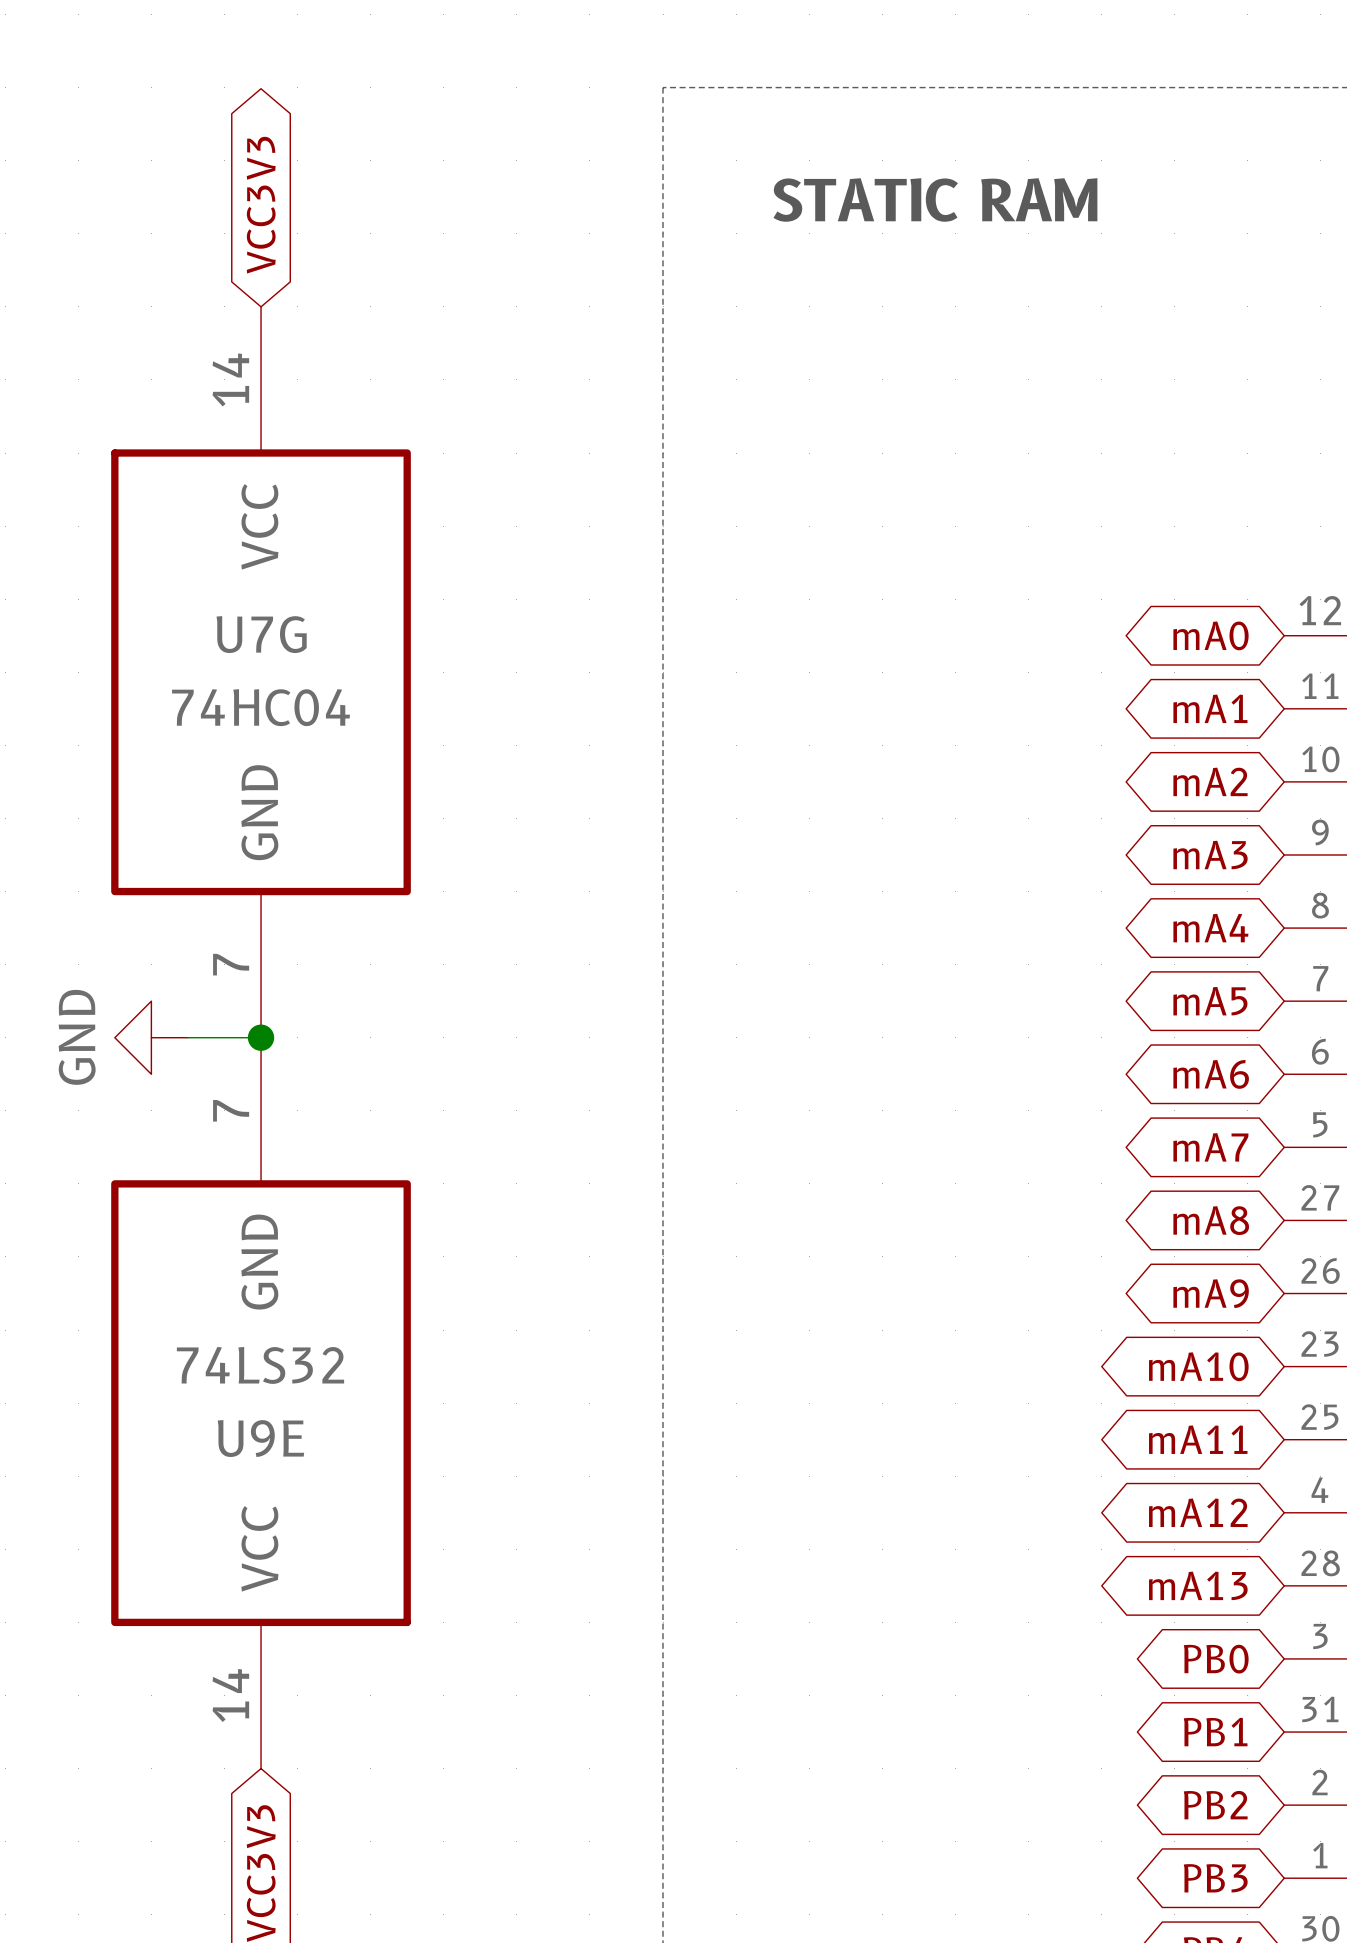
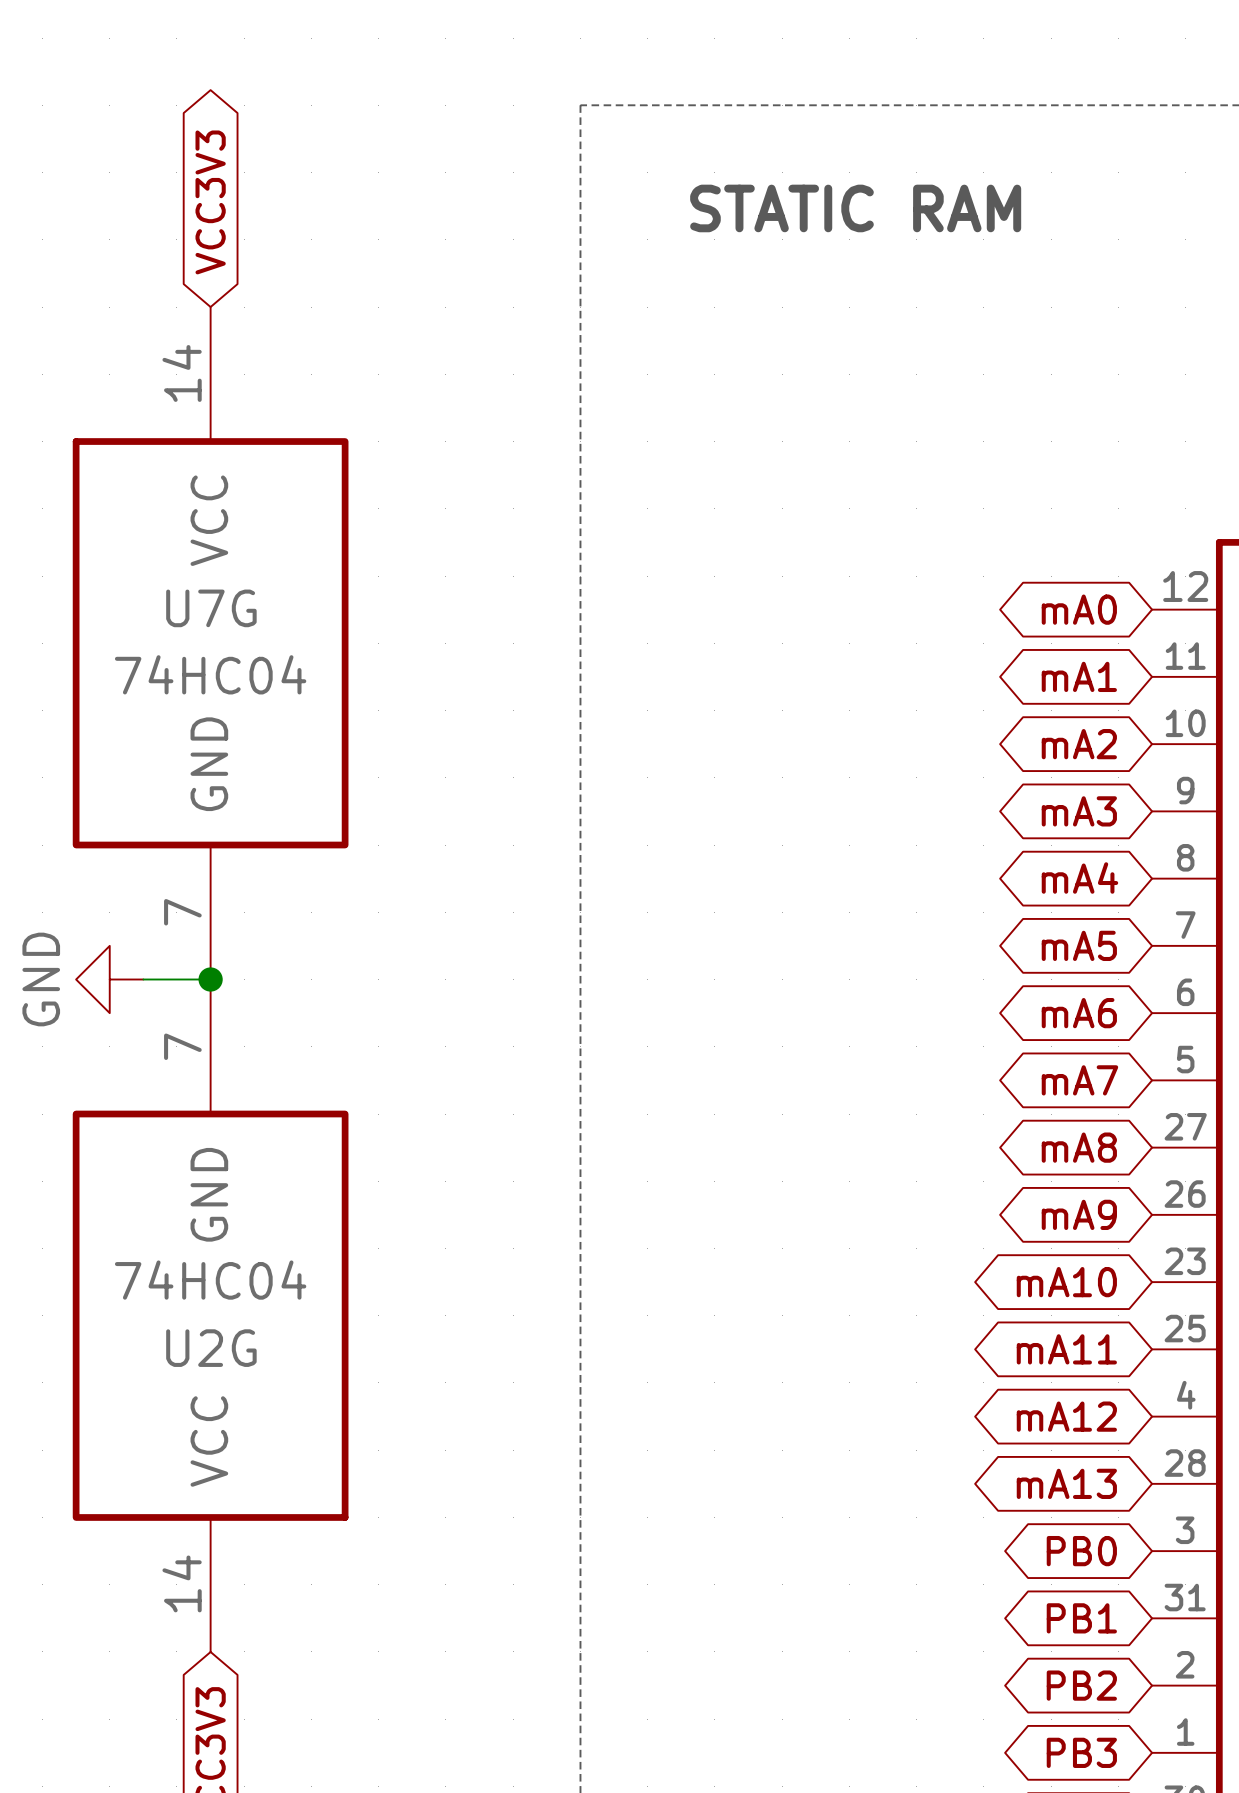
U9E value: 74LS32 (260, 1365) -> 74HC04 (210, 1280)
U9E name: U9E (260, 1438) -> U2G (211, 1348)

